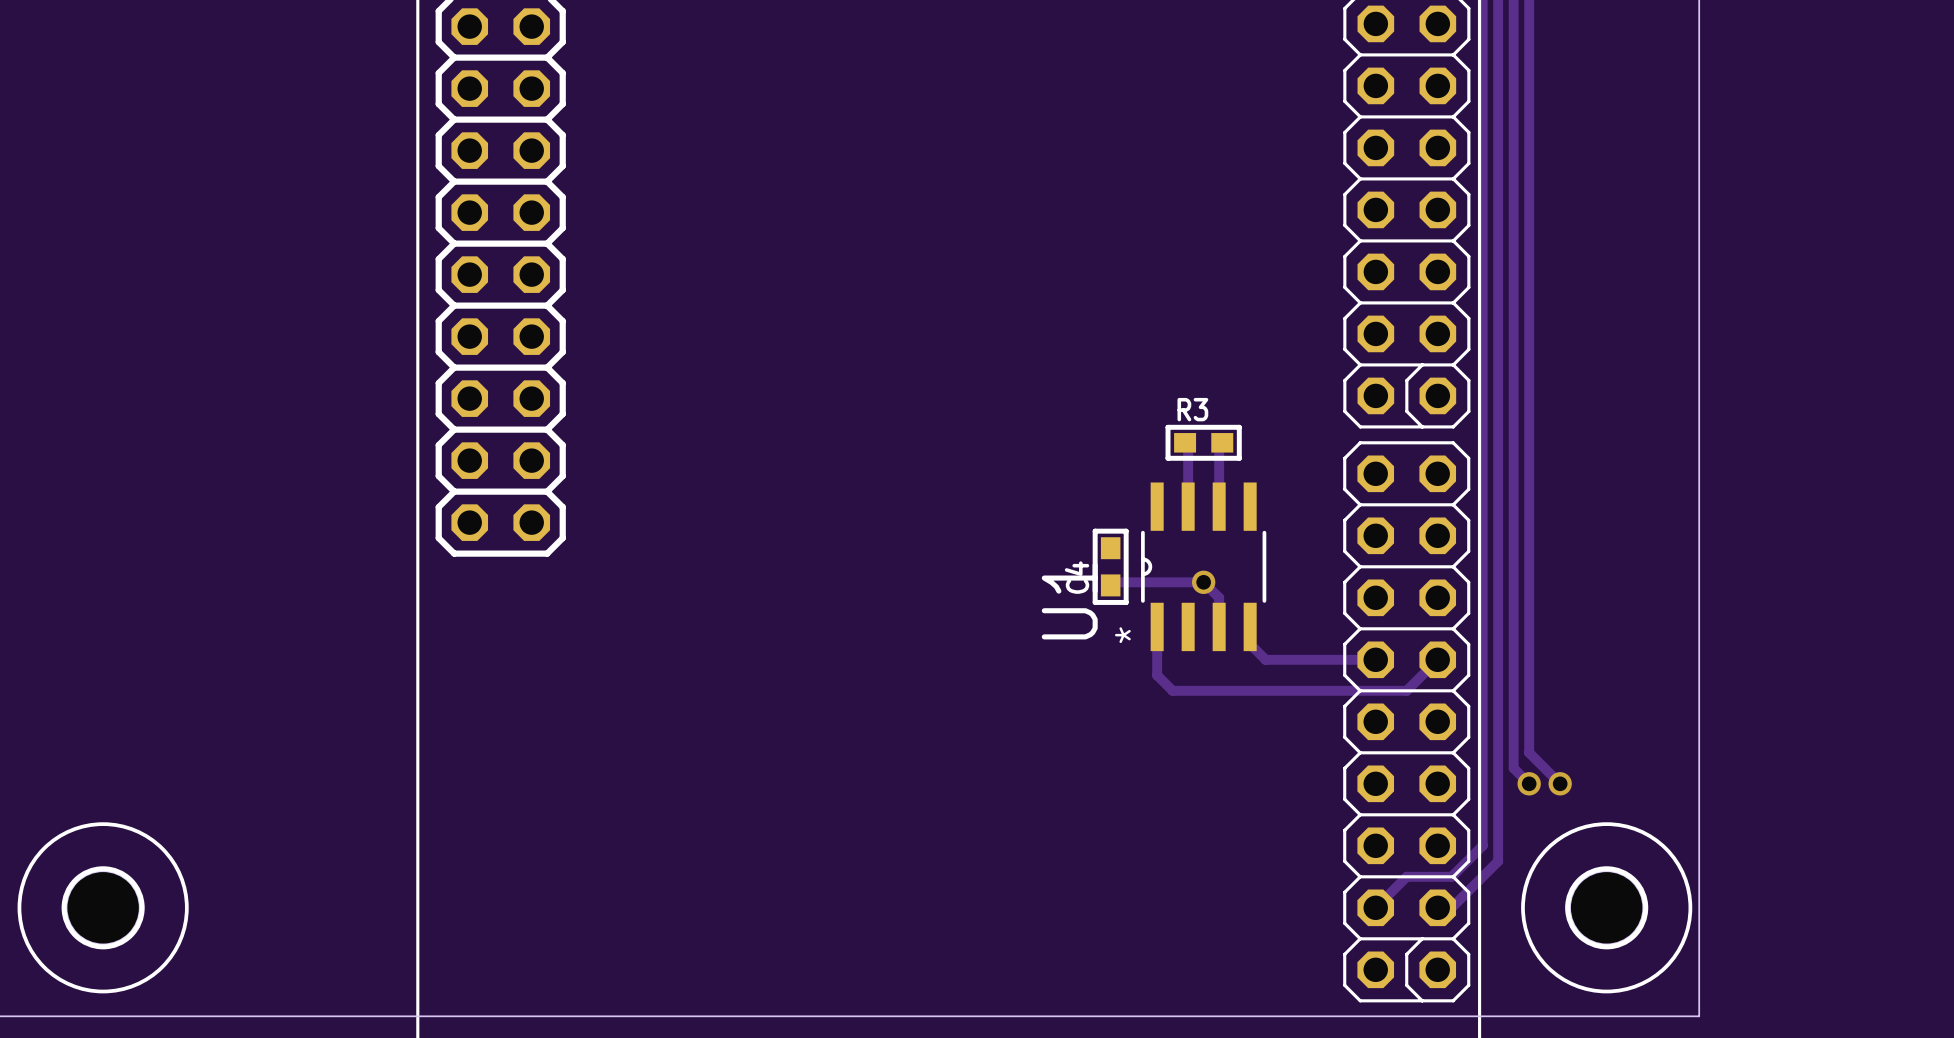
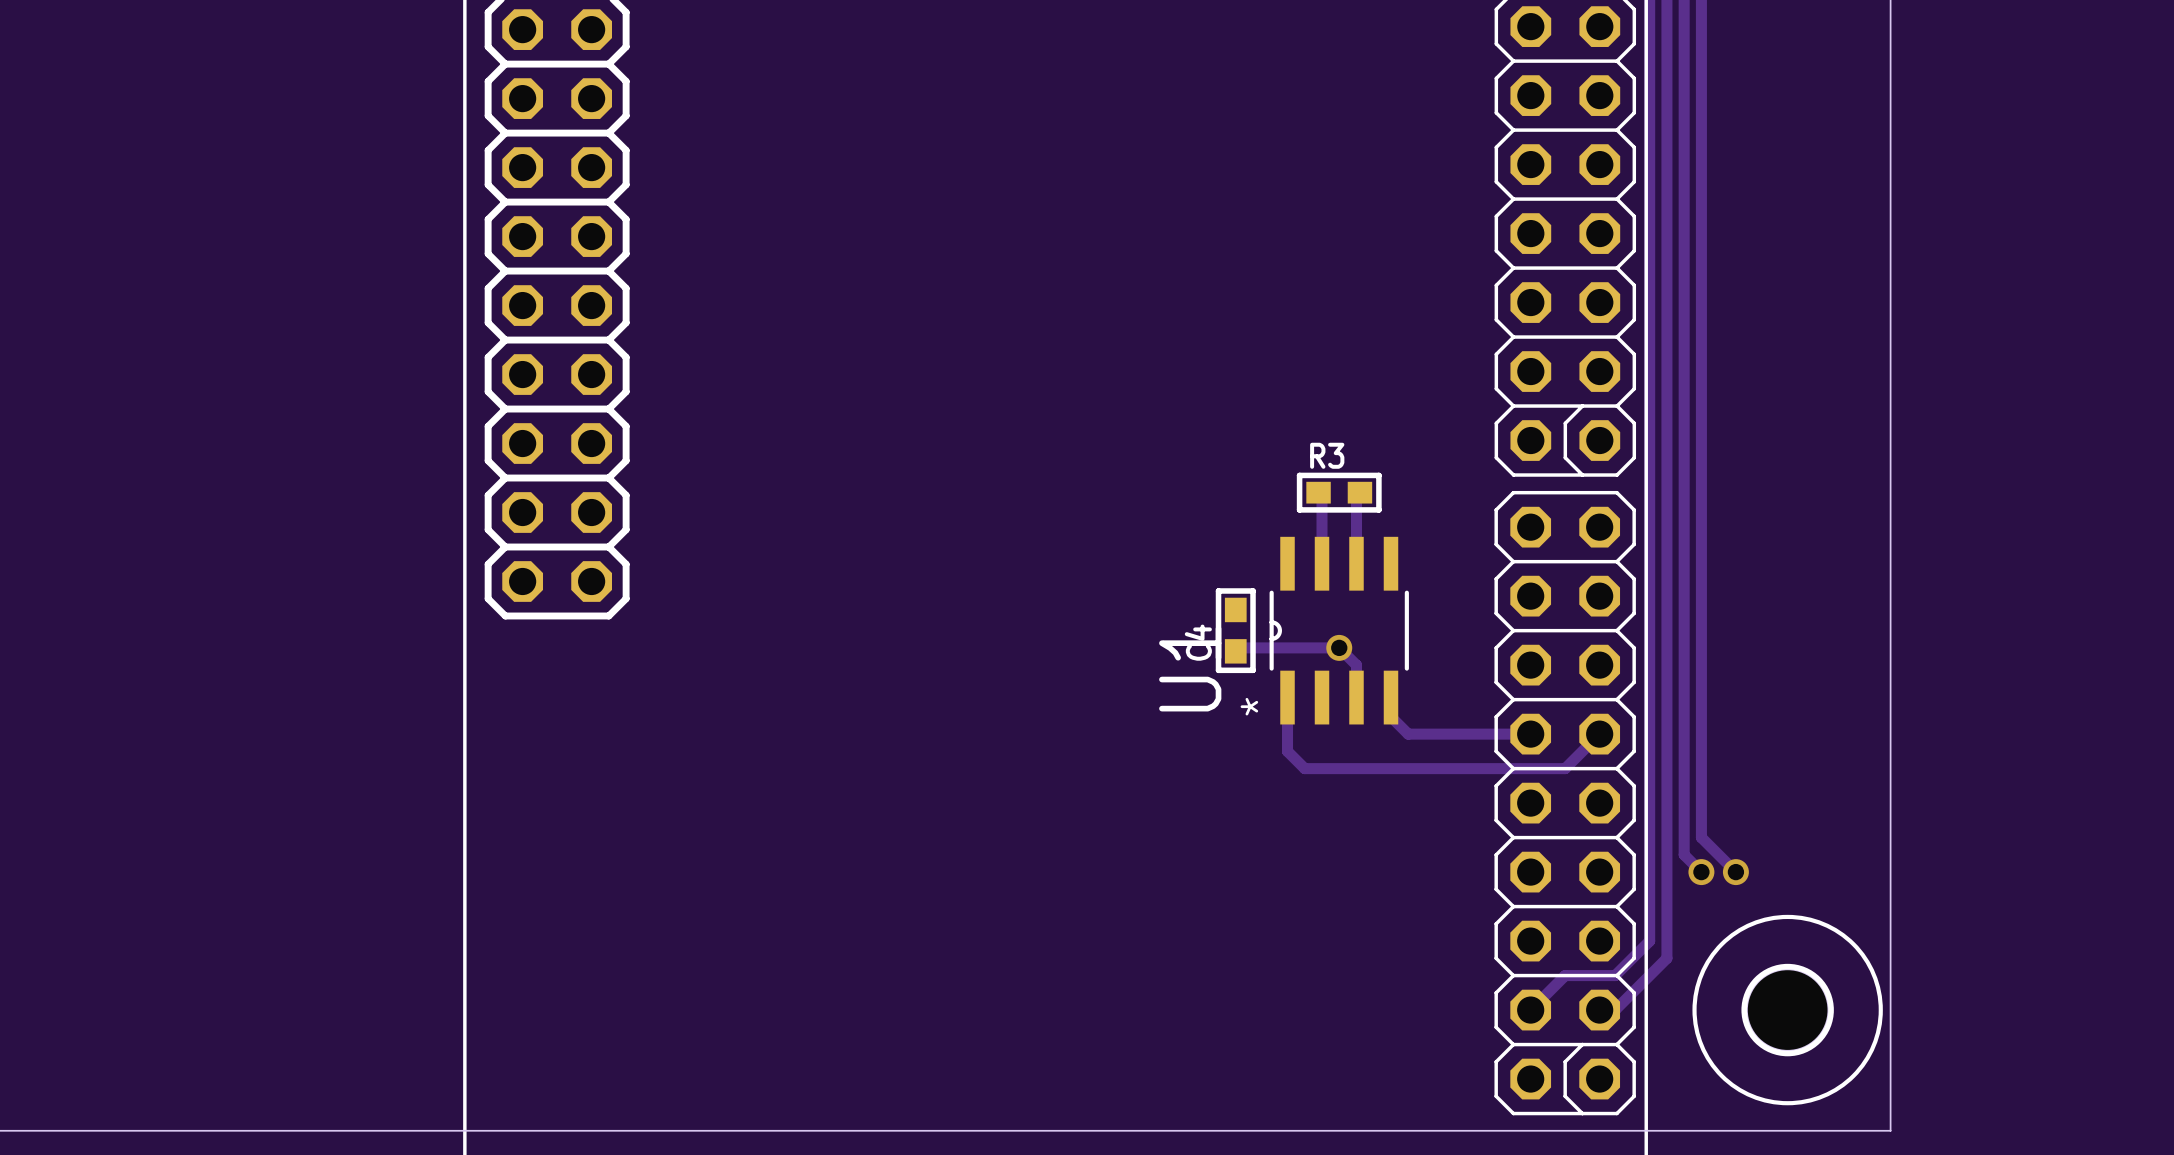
part: (103, 907) -> none

